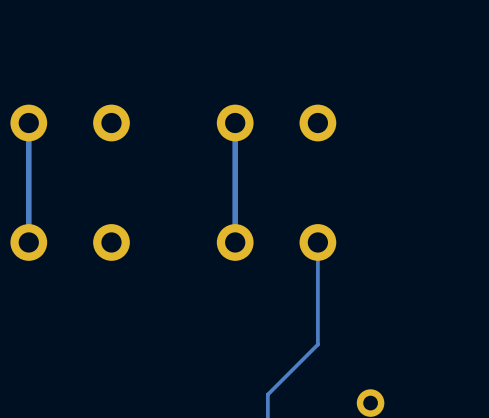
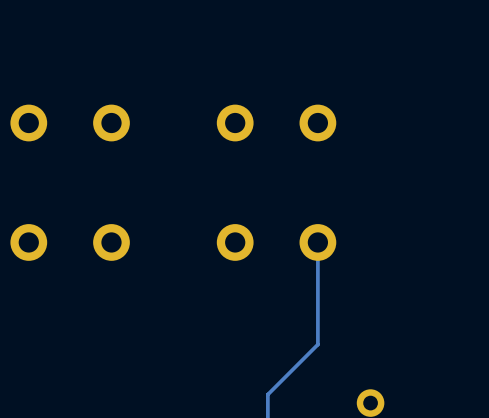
track: (28, 123) (28, 242) -> none
track: (235, 123) (235, 242) -> none

